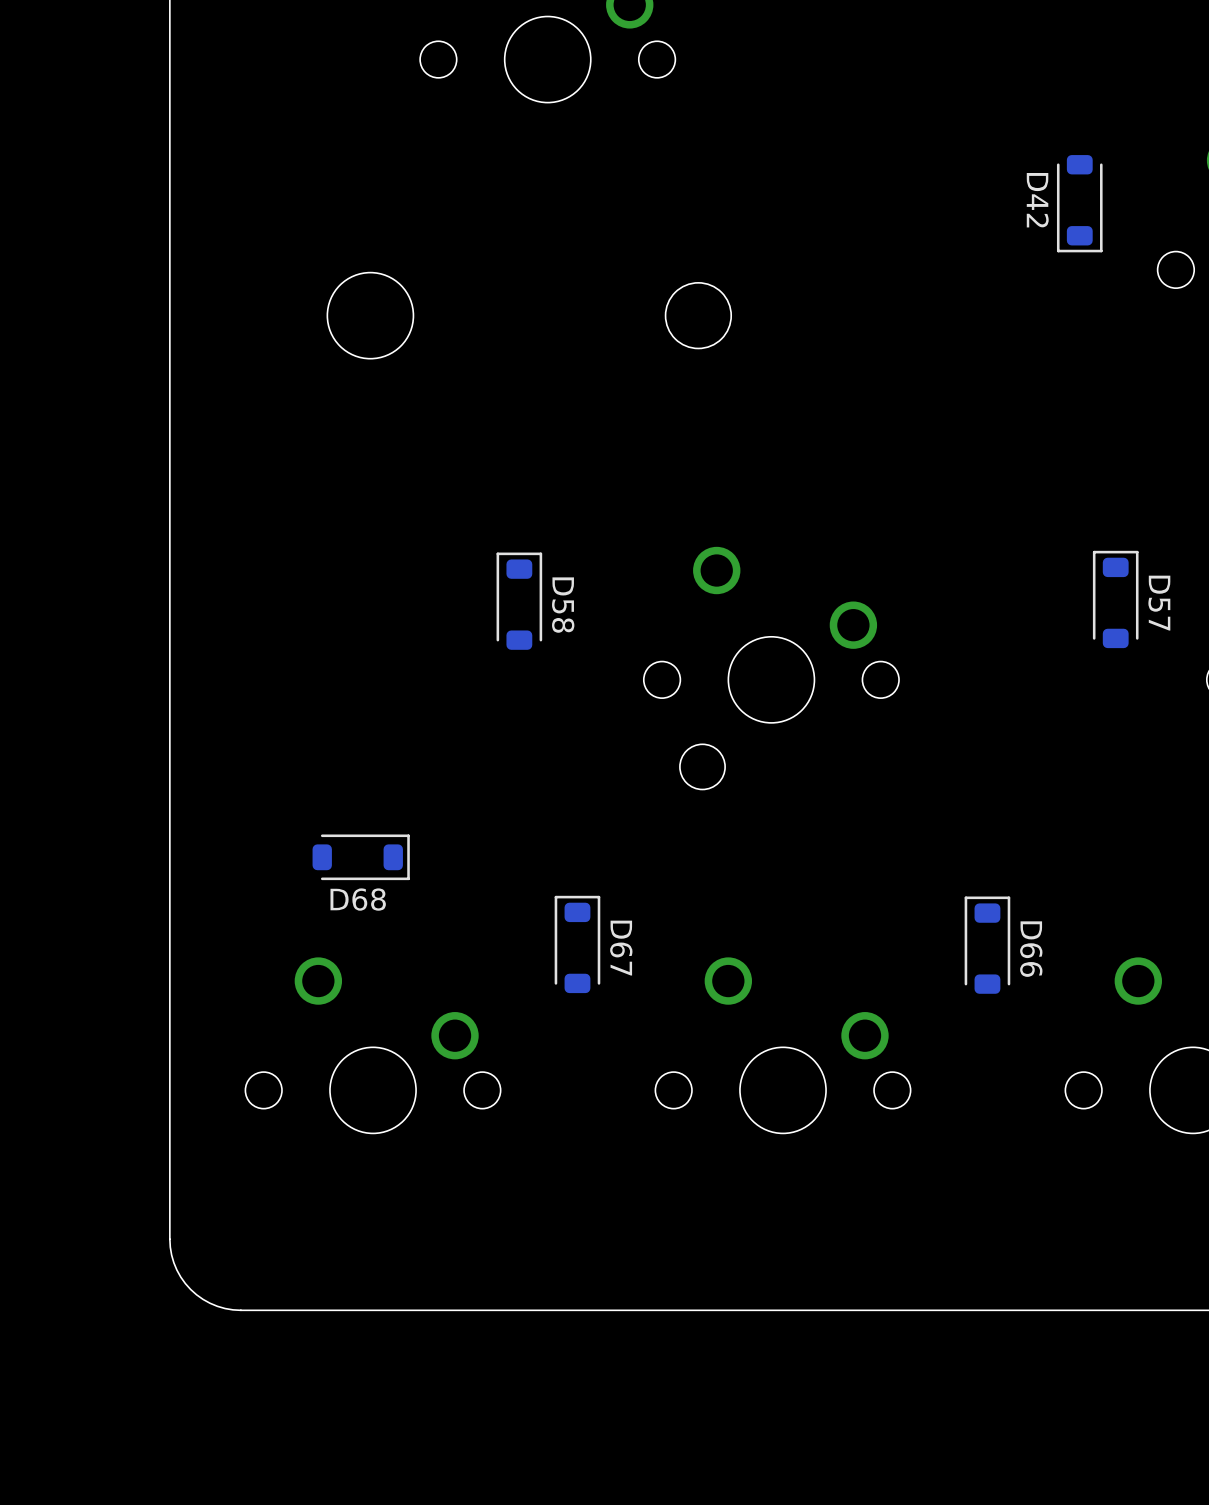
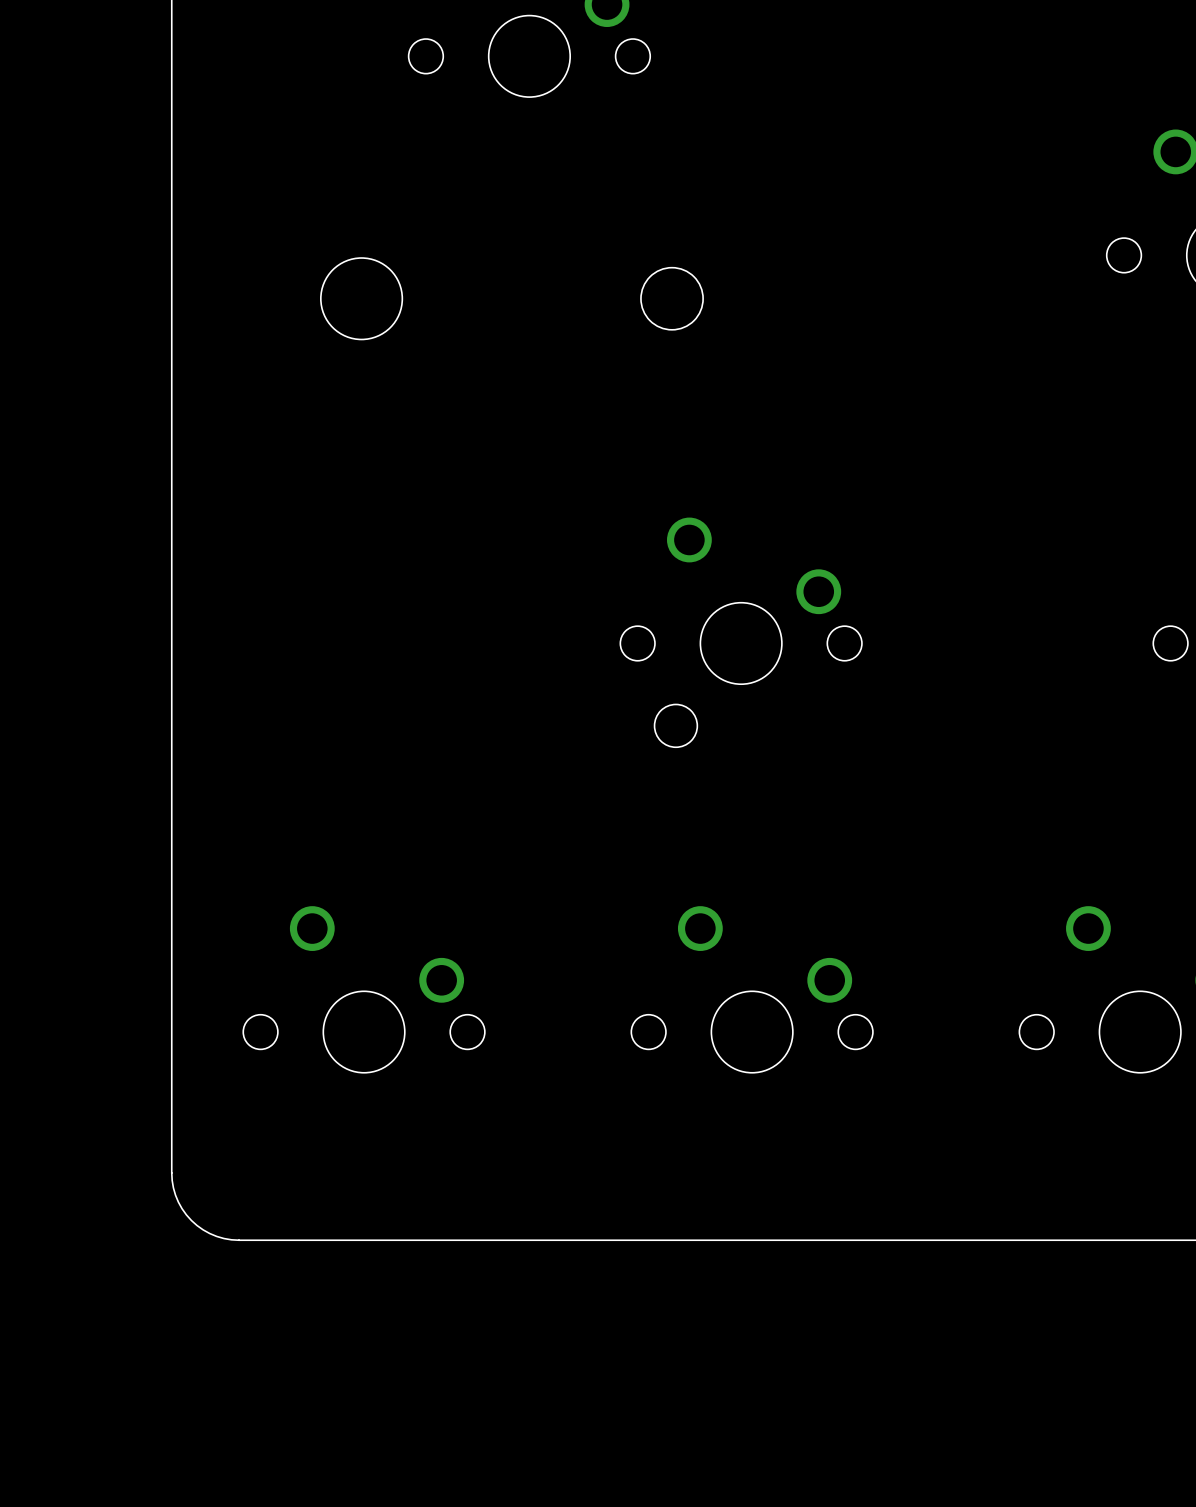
D42: (1079, 203) -> none
D57: (1115, 599) -> none
D58: (519, 601) -> none
D68: (361, 857) -> none
D67: (577, 944) -> none
D66: (987, 945) -> none

